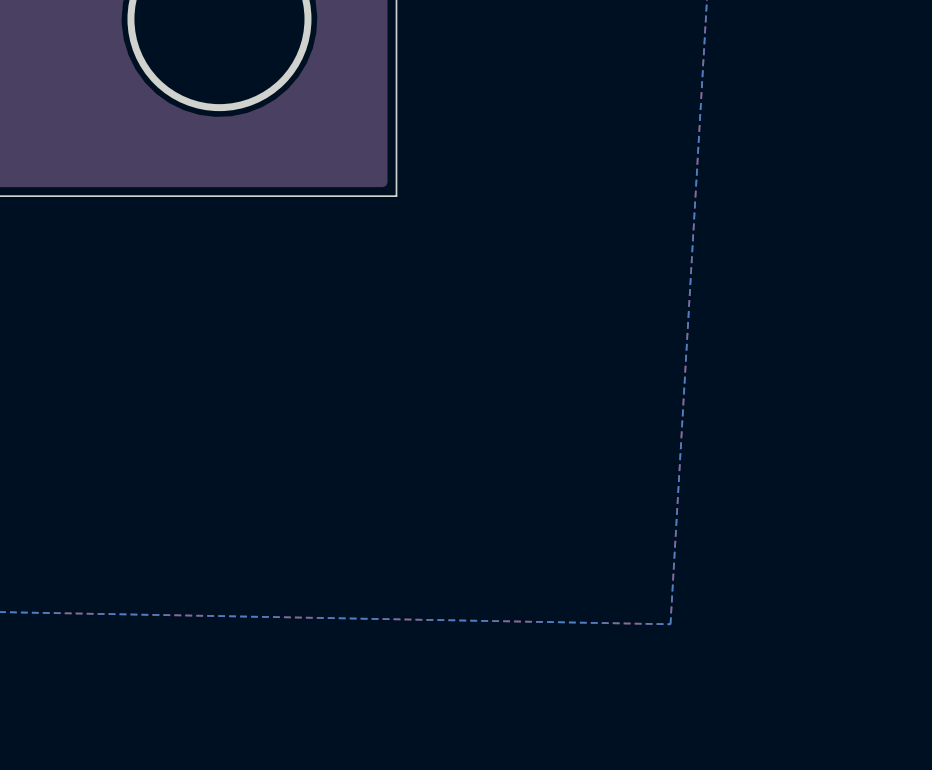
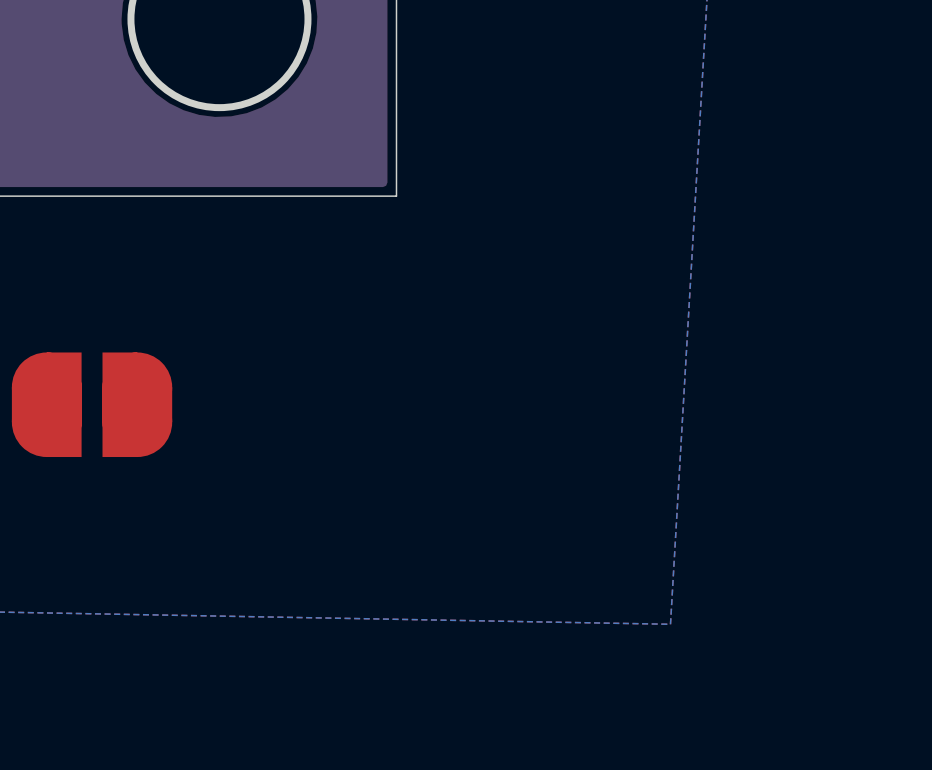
part: none -> (92, 404)

